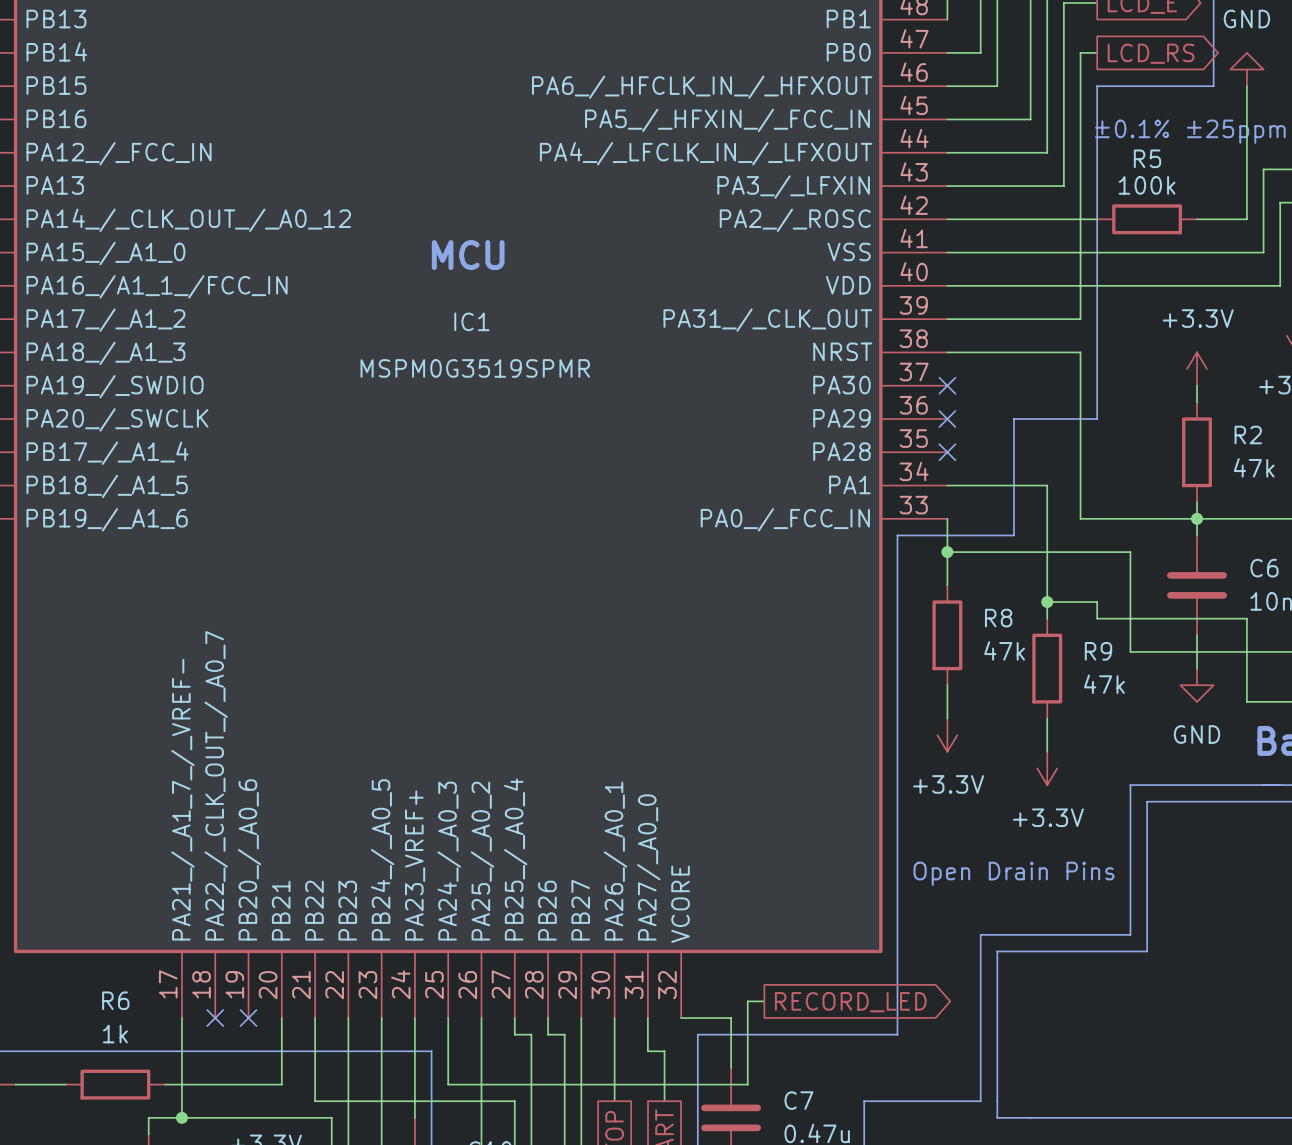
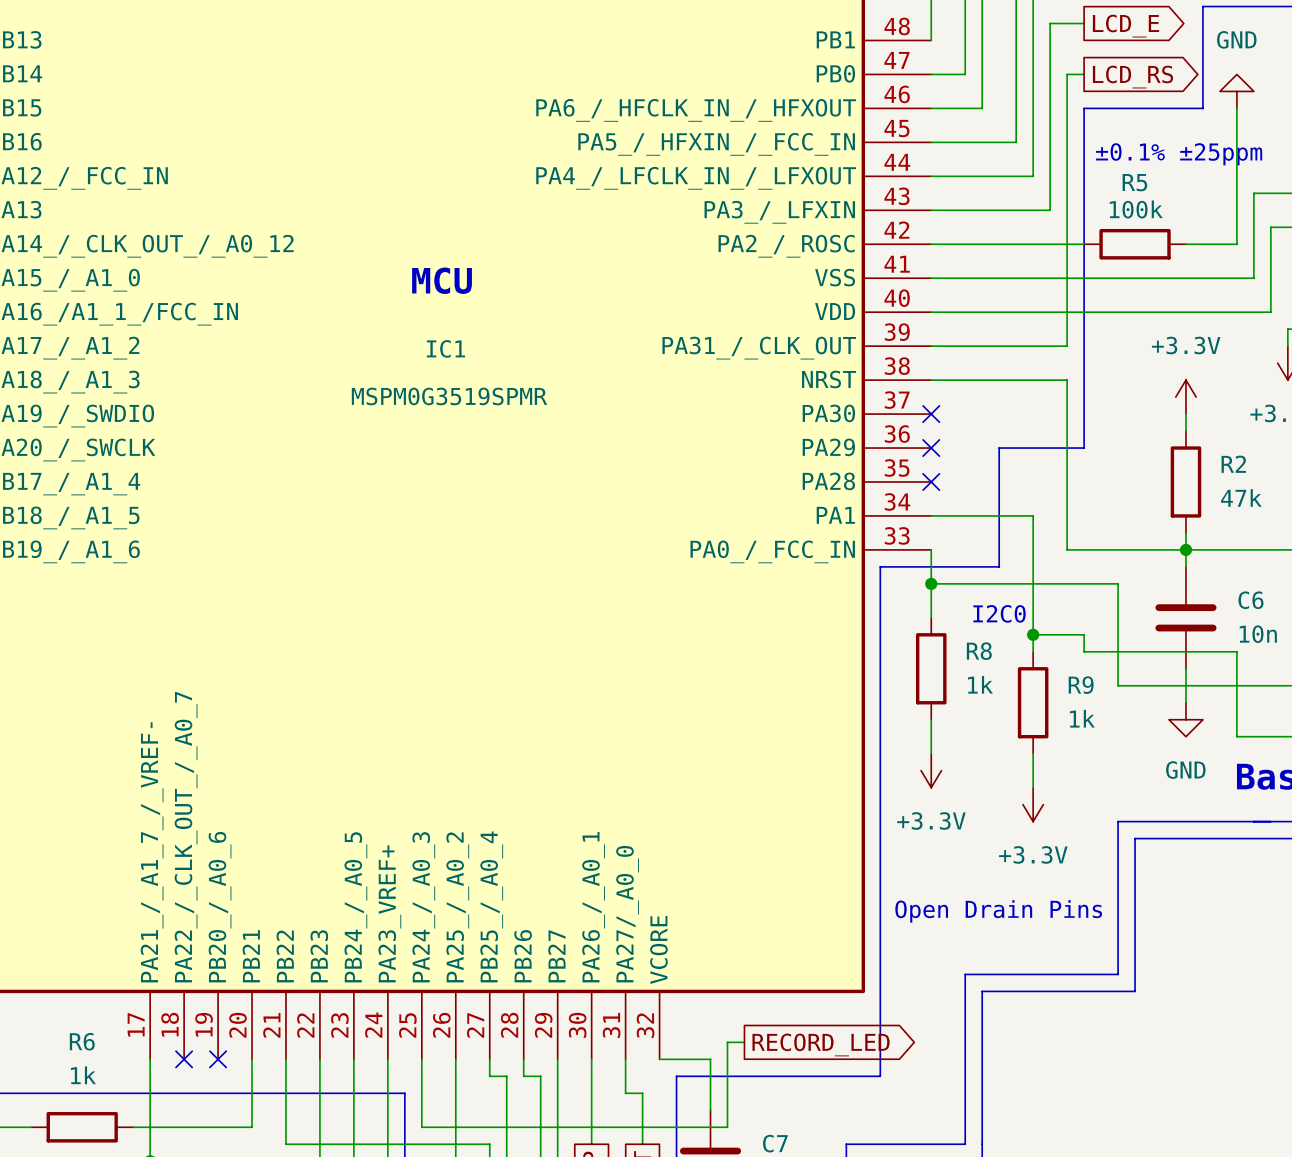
text: none -> I2C0 (999, 613)
R8 value: 47k (1004, 650) -> 1k (980, 684)
R9 value: 47k (1104, 684) -> 1k (1082, 718)

